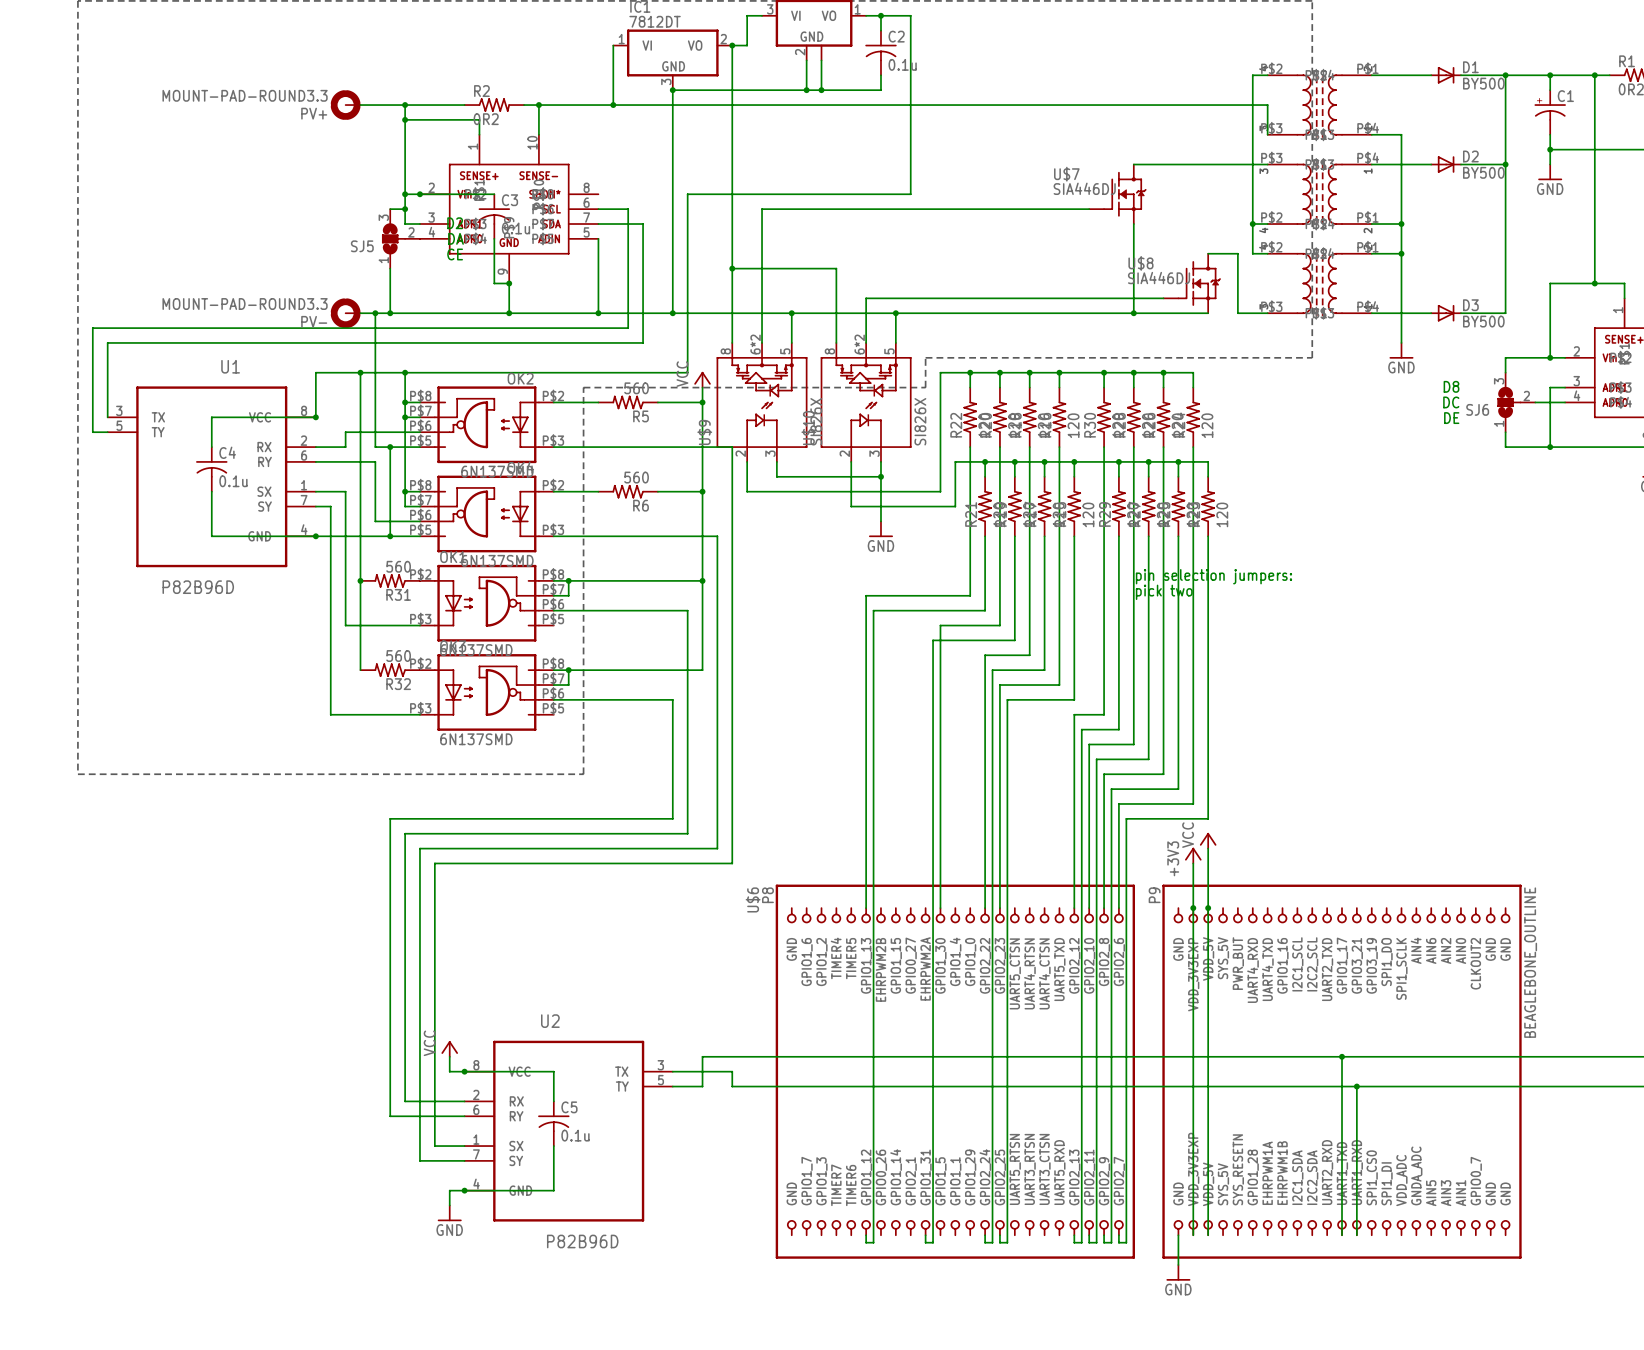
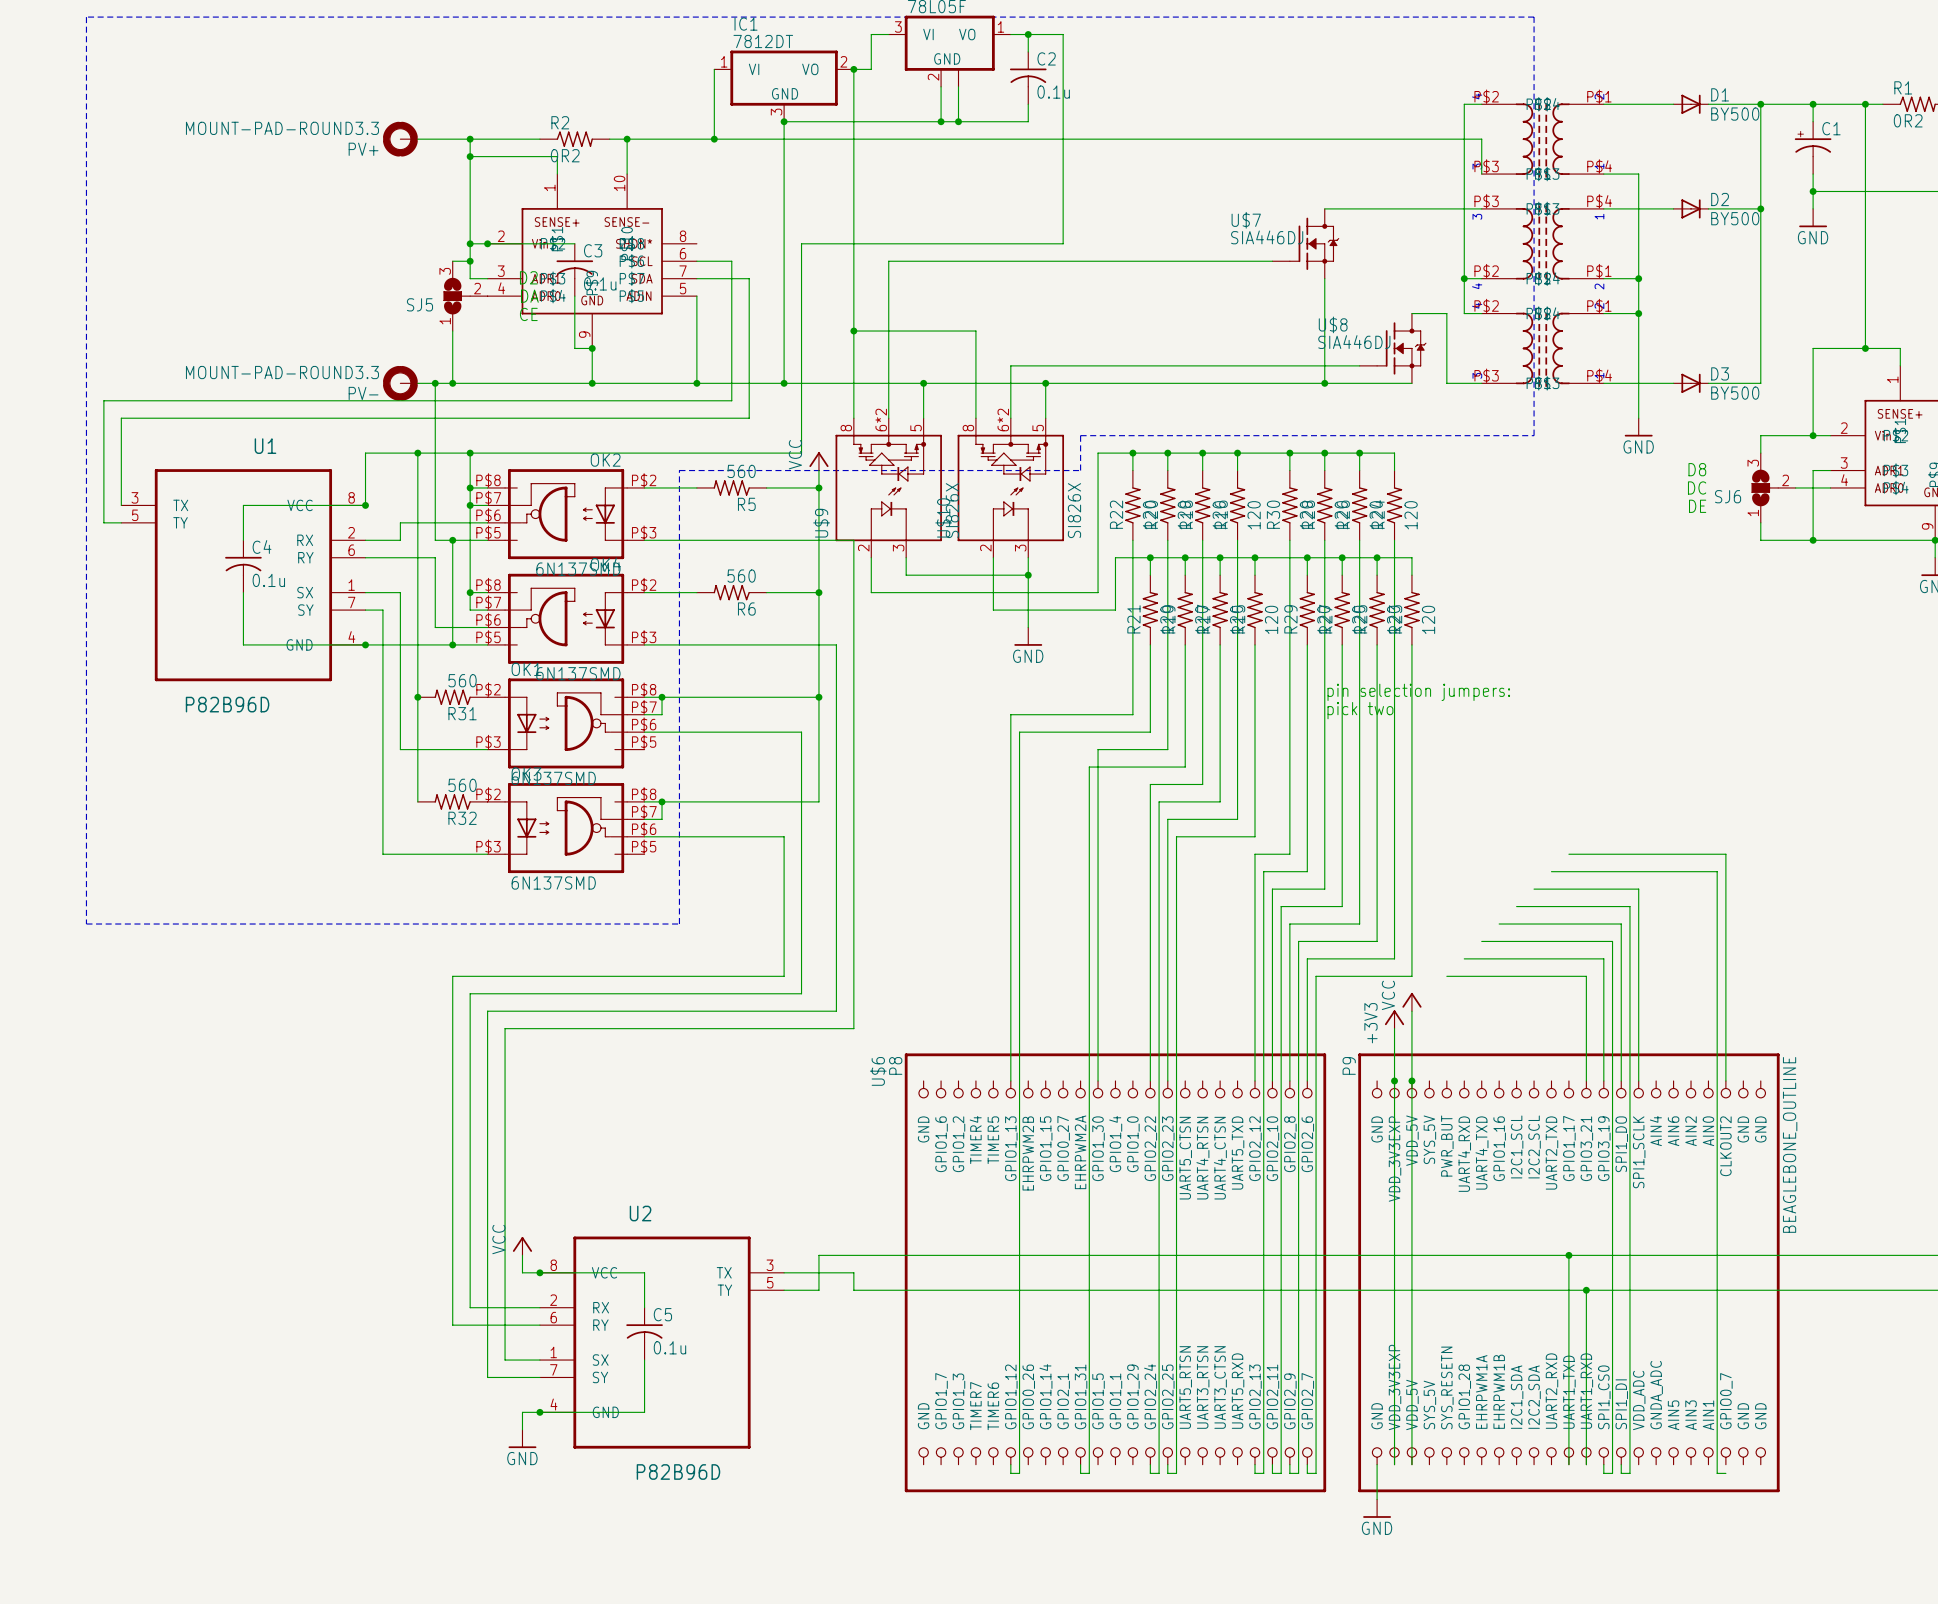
wire: none -> (1568, 854) (1725, 854) (1725, 1080)
wire: none -> (1551, 871) (1717, 871) (1717, 1473) (1725, 1473)
wire: none -> (1534, 889) (1638, 889) (1638, 1080)
wire: none -> (1516, 906) (1629, 906) (1629, 1473) (1621, 1473) (1621, 1464)
wire: none -> (1499, 924) (1621, 924) (1621, 1080)
wire: none -> (1481, 941) (1612, 941) (1612, 1473) (1603, 1473) (1603, 1464)
wire: none -> (1464, 958) (1603, 958) (1603, 1080)
wire: none -> (1446, 976) (1586, 976) (1586, 1080)

